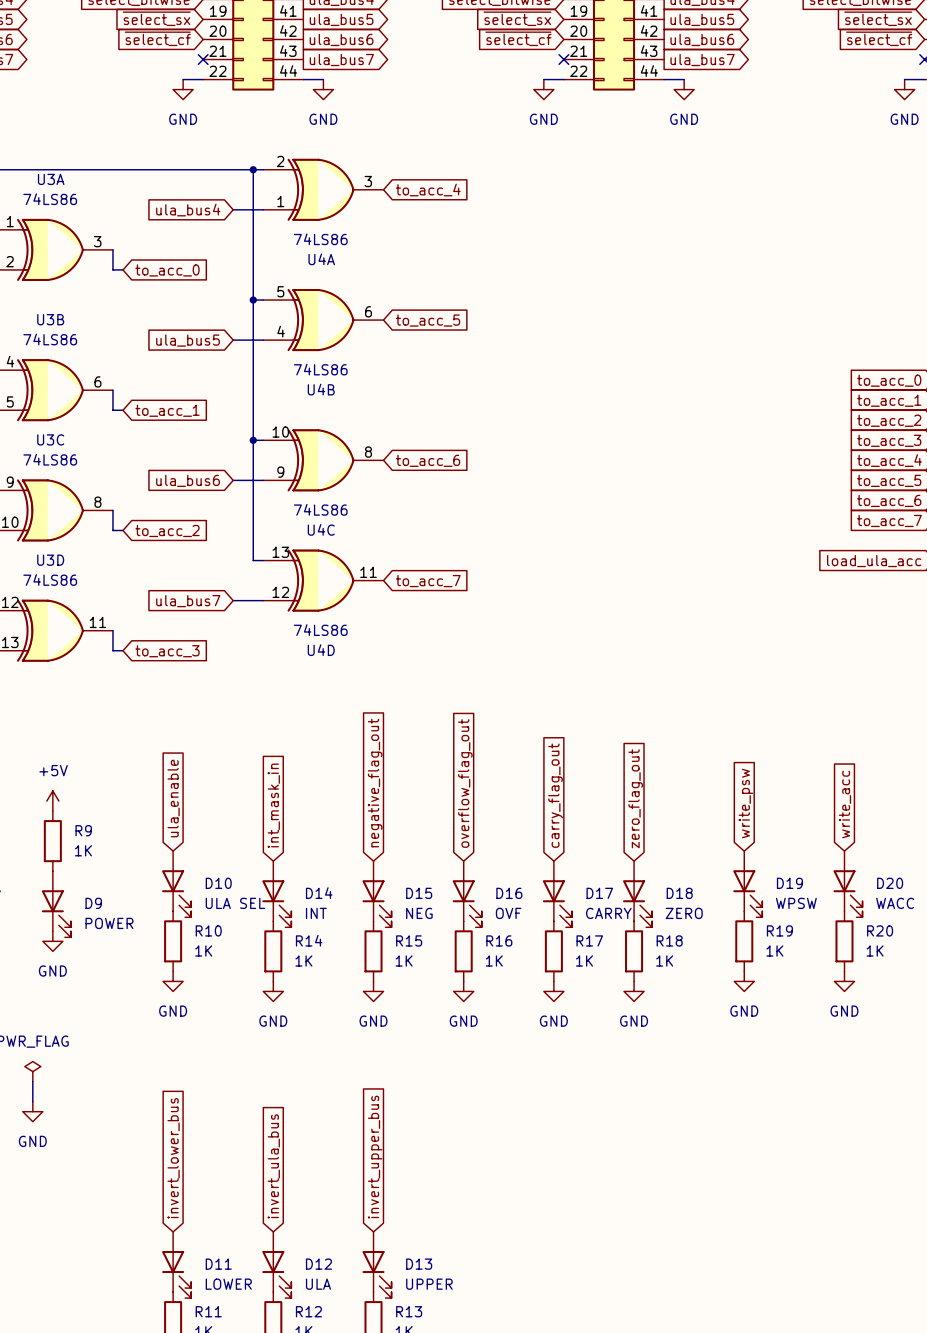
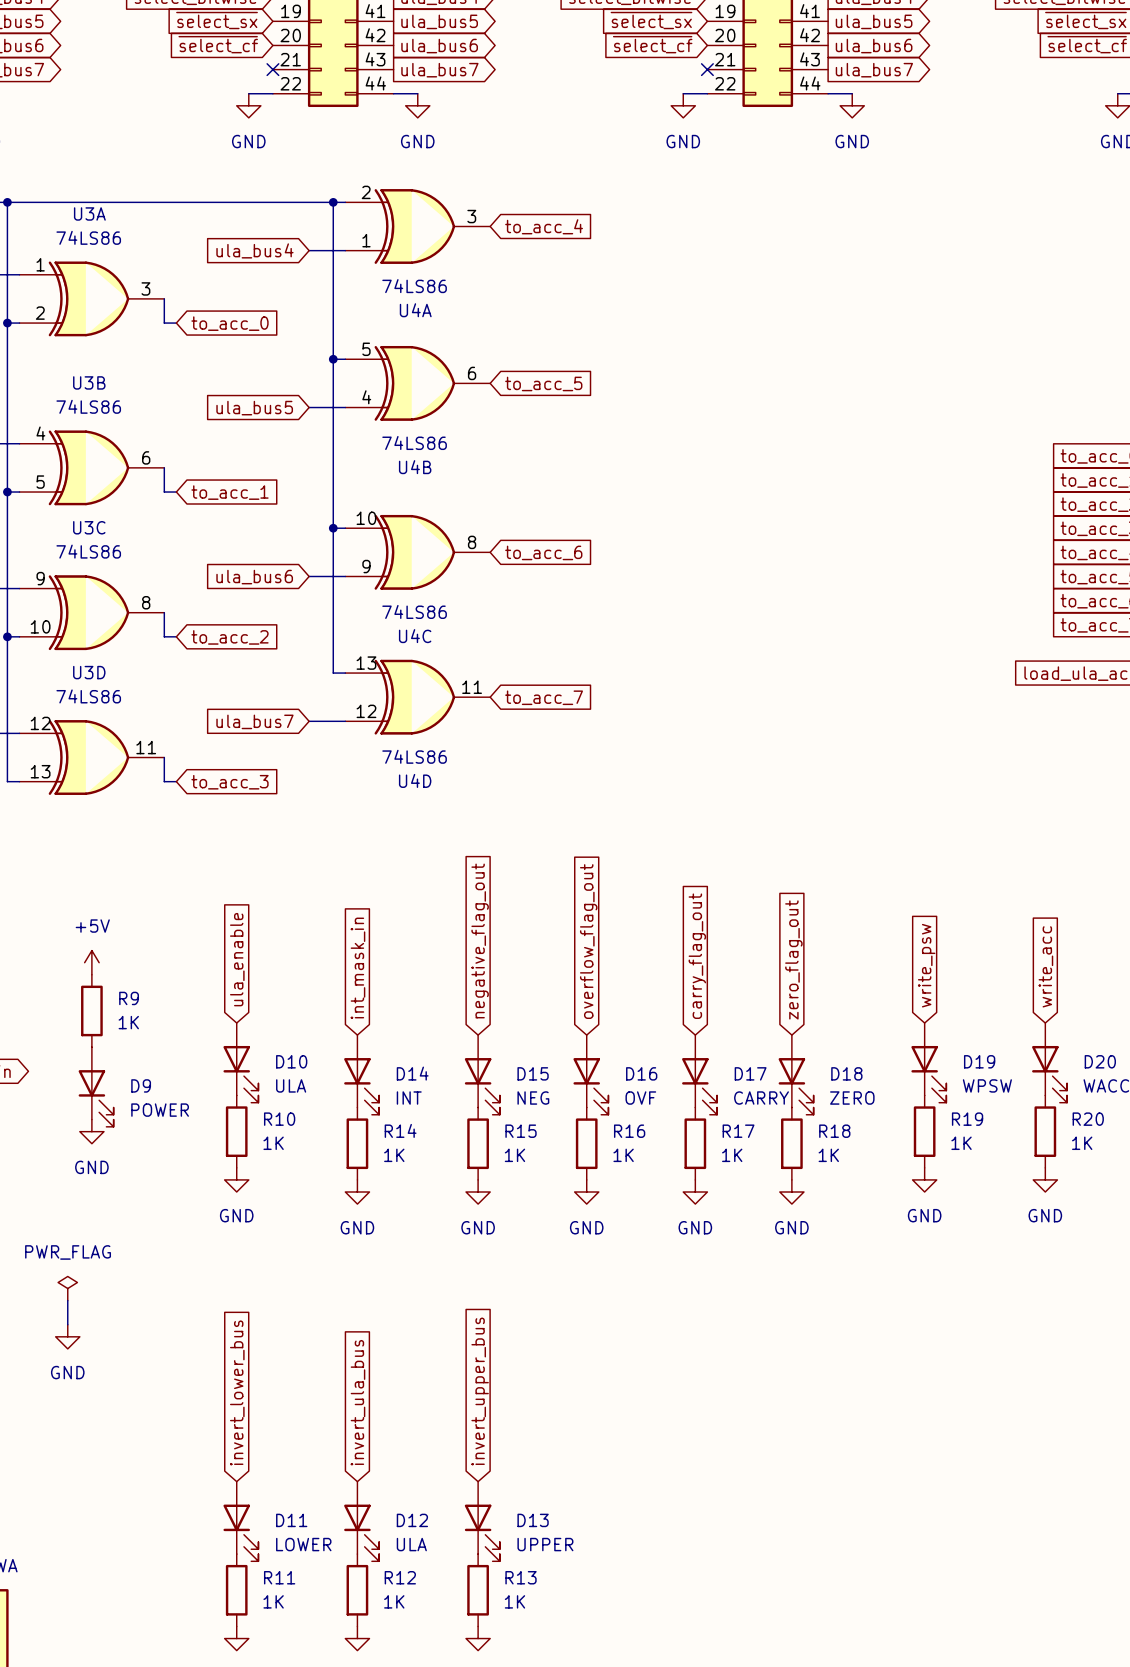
D10 value: ULA SEL (235, 903) -> ULA (291, 1085)

